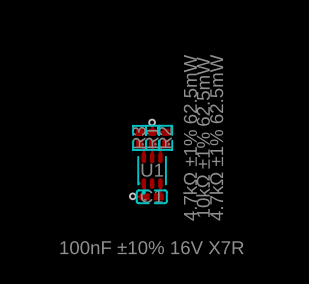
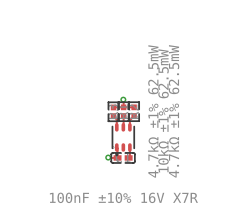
U1 name: U1 (152, 170) -> none

